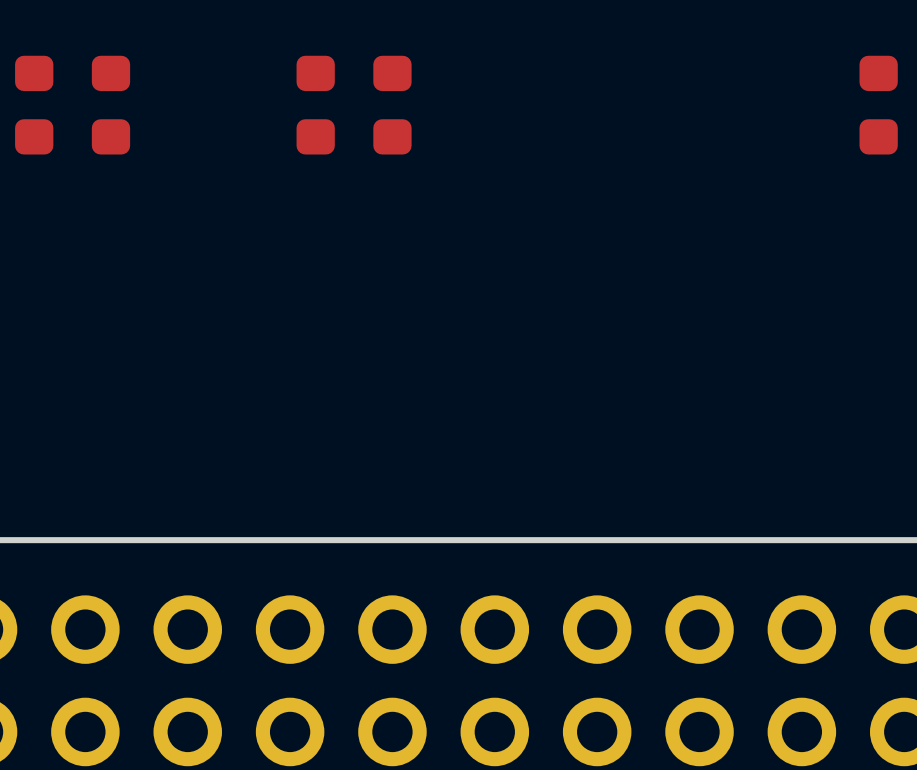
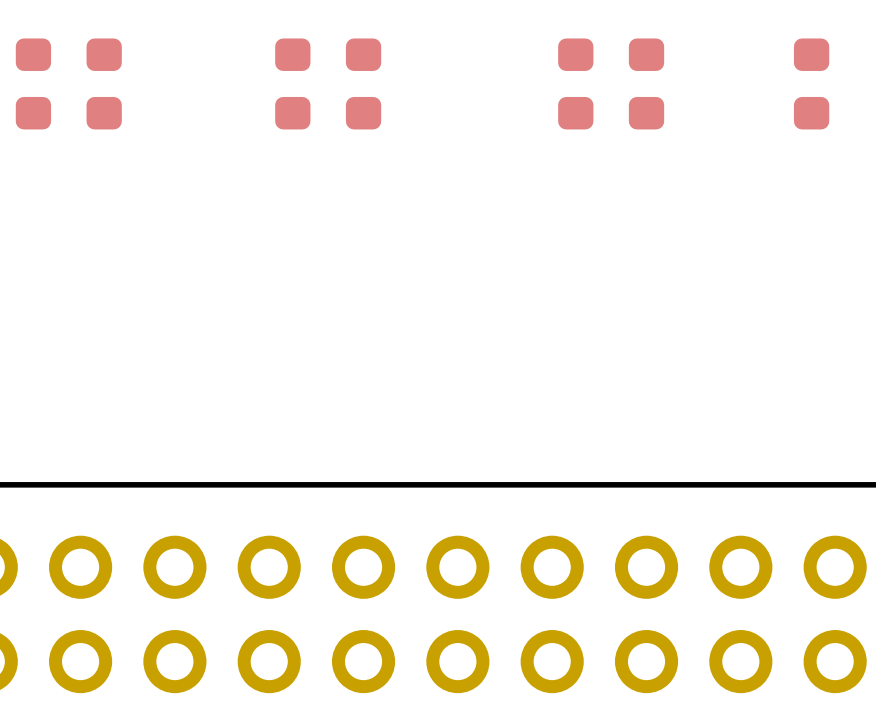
part: none -> (575, 83)
part: none -> (646, 83)

